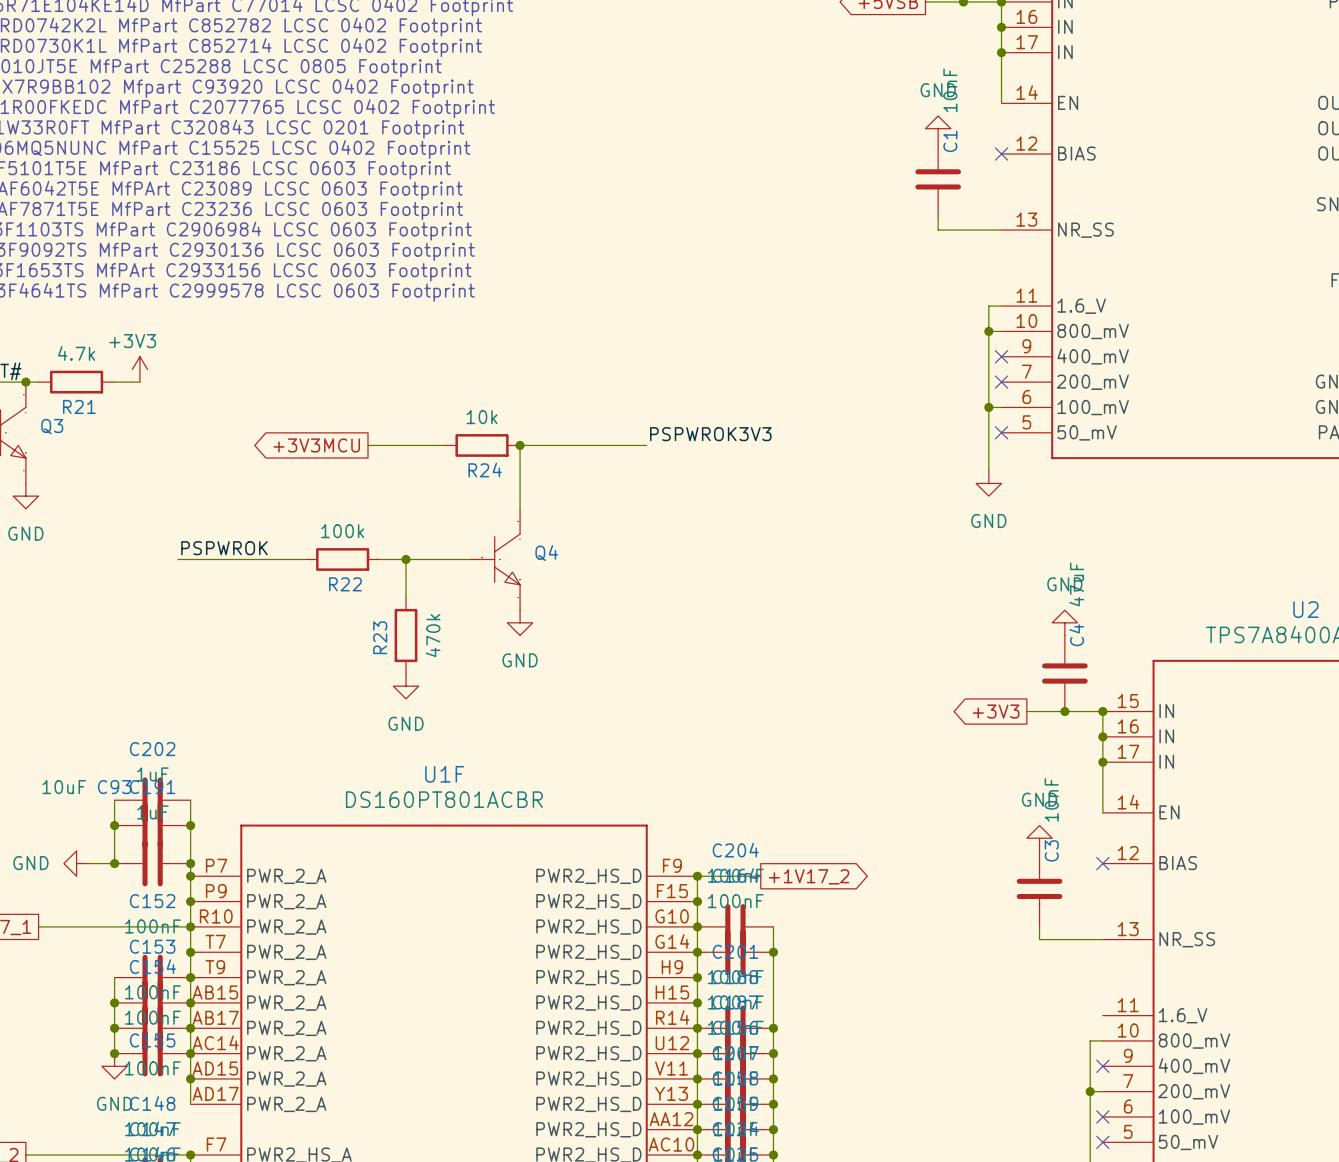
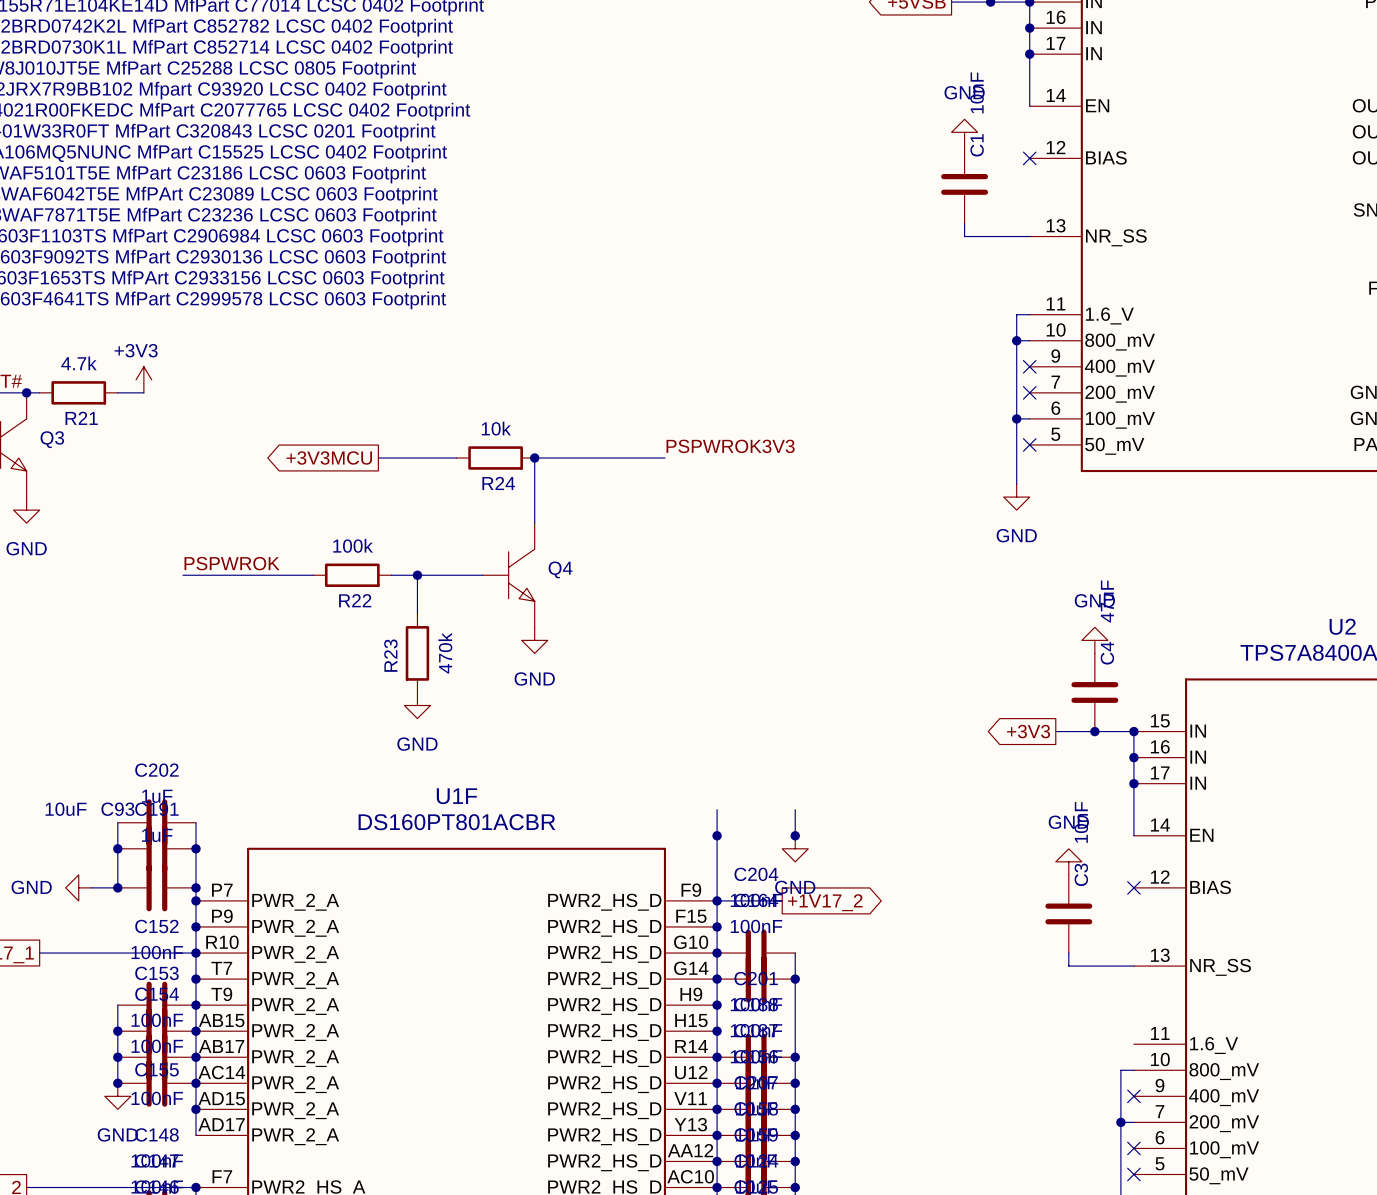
wire: none -> (717, 809) (717, 900)
wire: none -> (795, 809) (795, 835)
junction: none -> (717, 835)
junction: none -> (795, 835)
power symbol: none -> GND (795, 848)

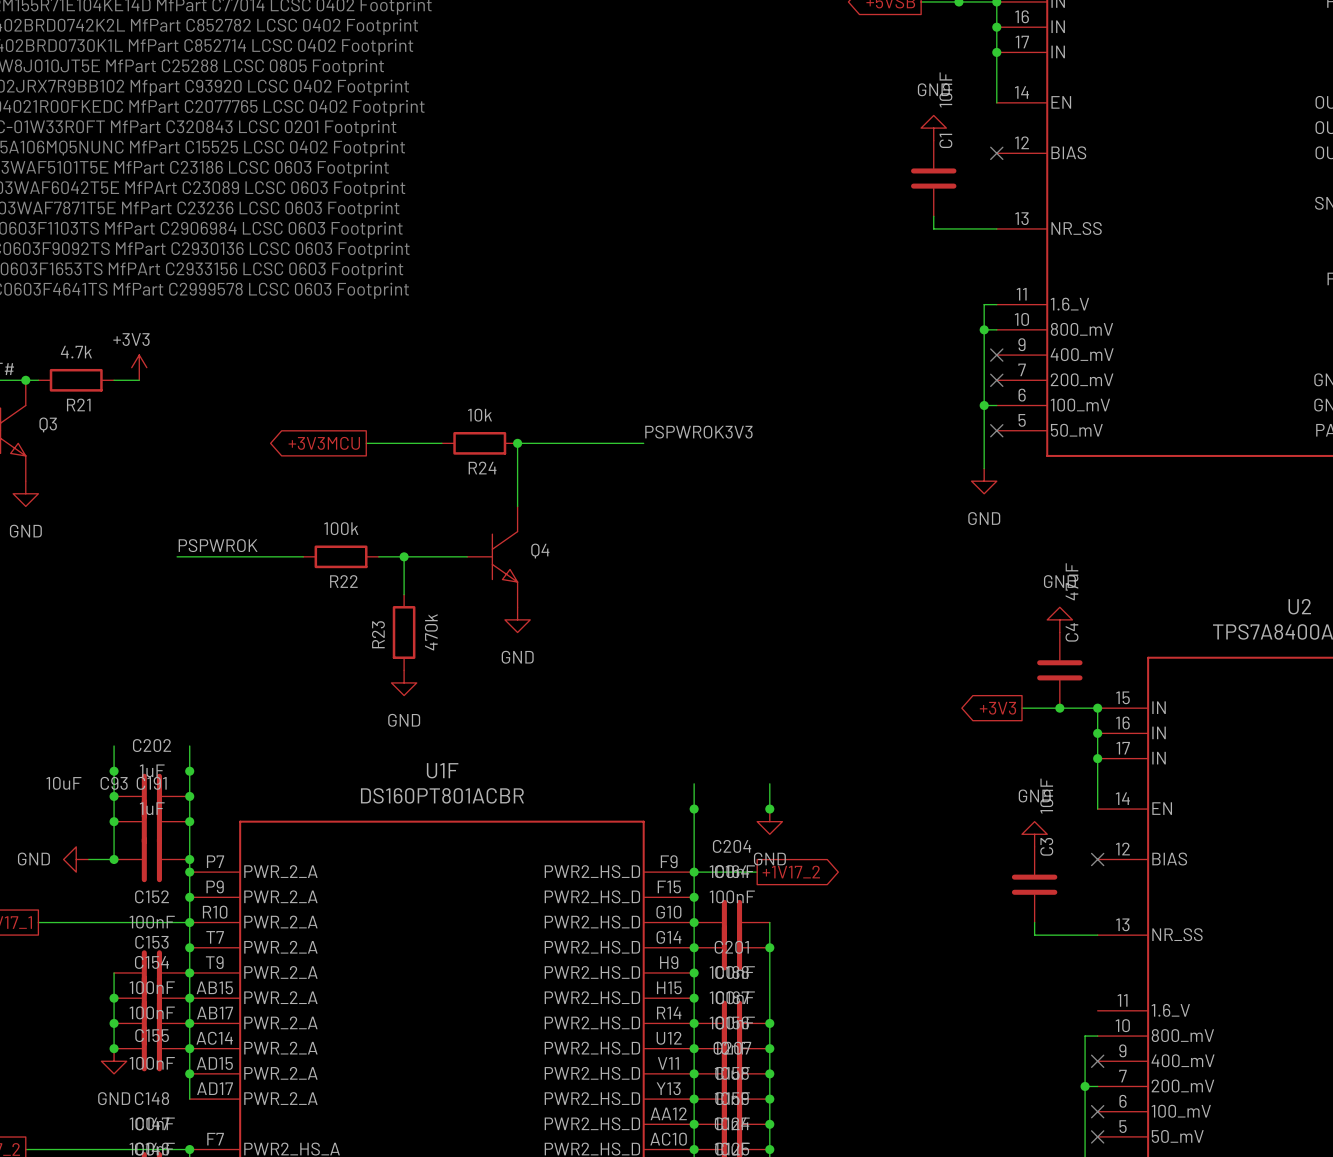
wire: none -> (114, 746) (114, 796)
wire: none -> (189, 746) (189, 796)
junction: none -> (114, 771)
junction: none -> (189, 771)
junction: none -> (114, 796)
junction: none -> (189, 796)

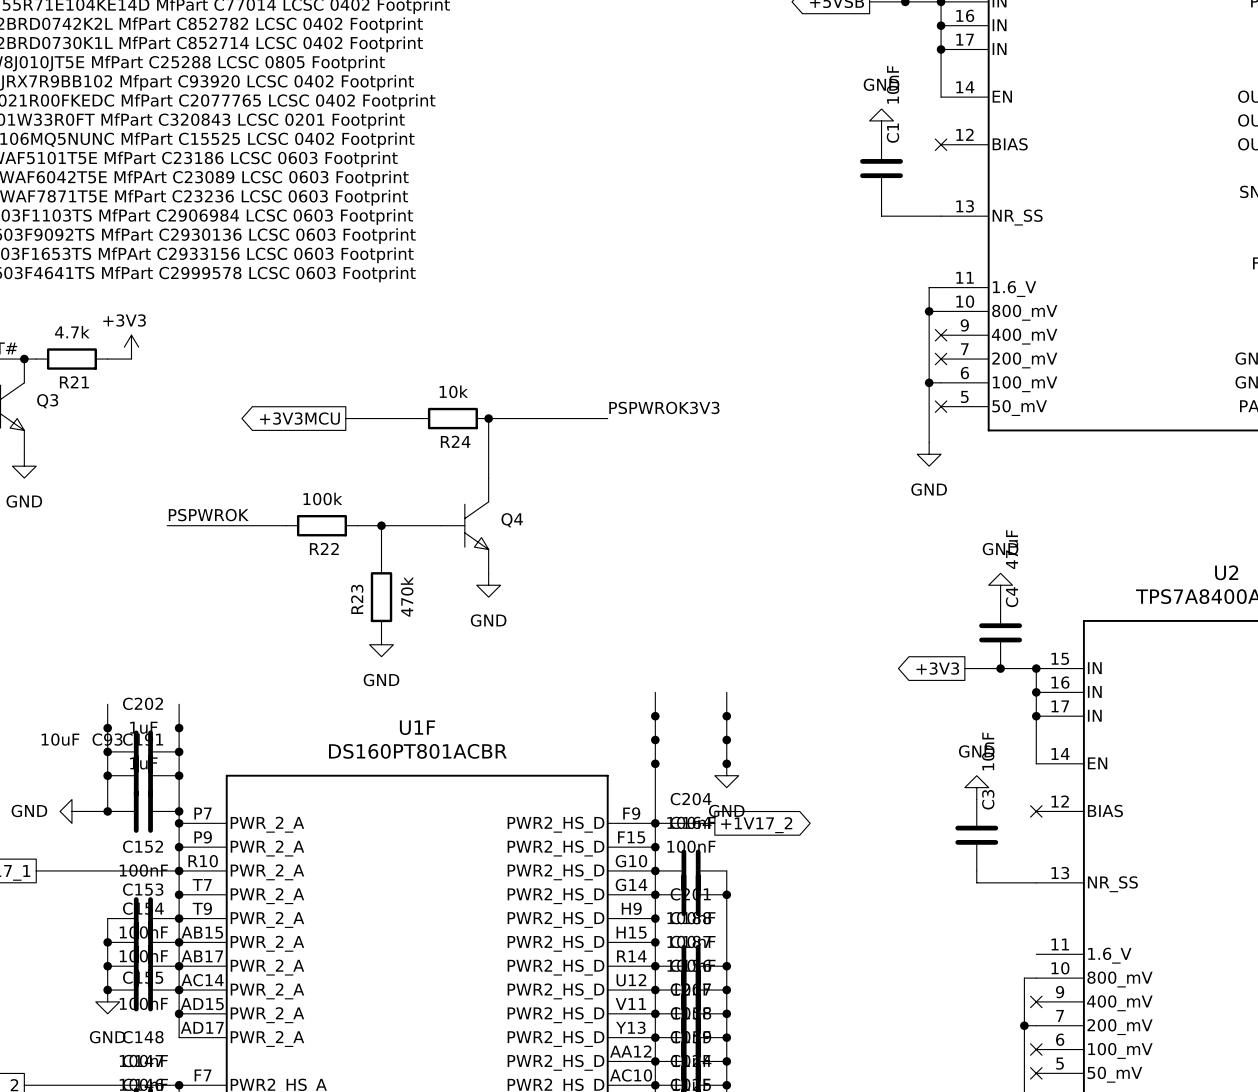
wire: none -> (655, 692) (655, 740)
wire: none -> (726, 692) (726, 740)
junction: none -> (655, 716)
junction: none -> (726, 716)
junction: none -> (655, 740)
junction: none -> (726, 740)

